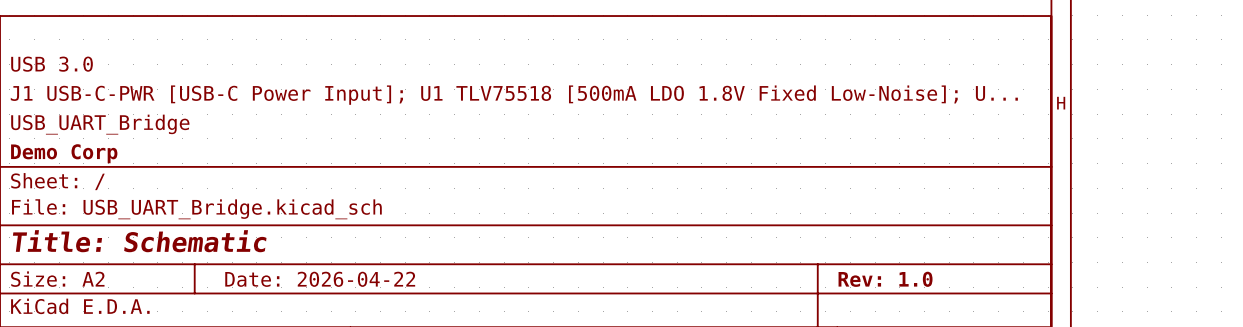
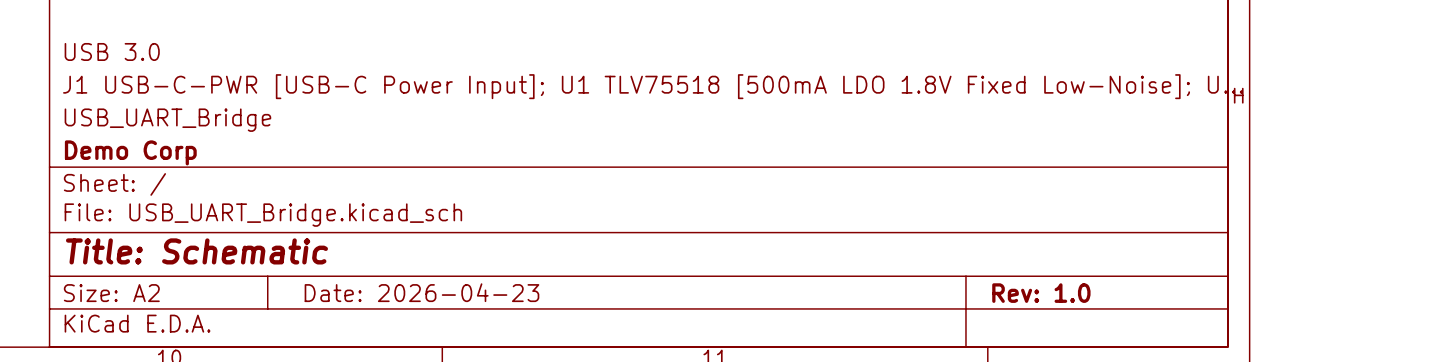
title block: Date: 2026-04-22 (320, 279) -> Date: 2026-04-23 (421, 292)

